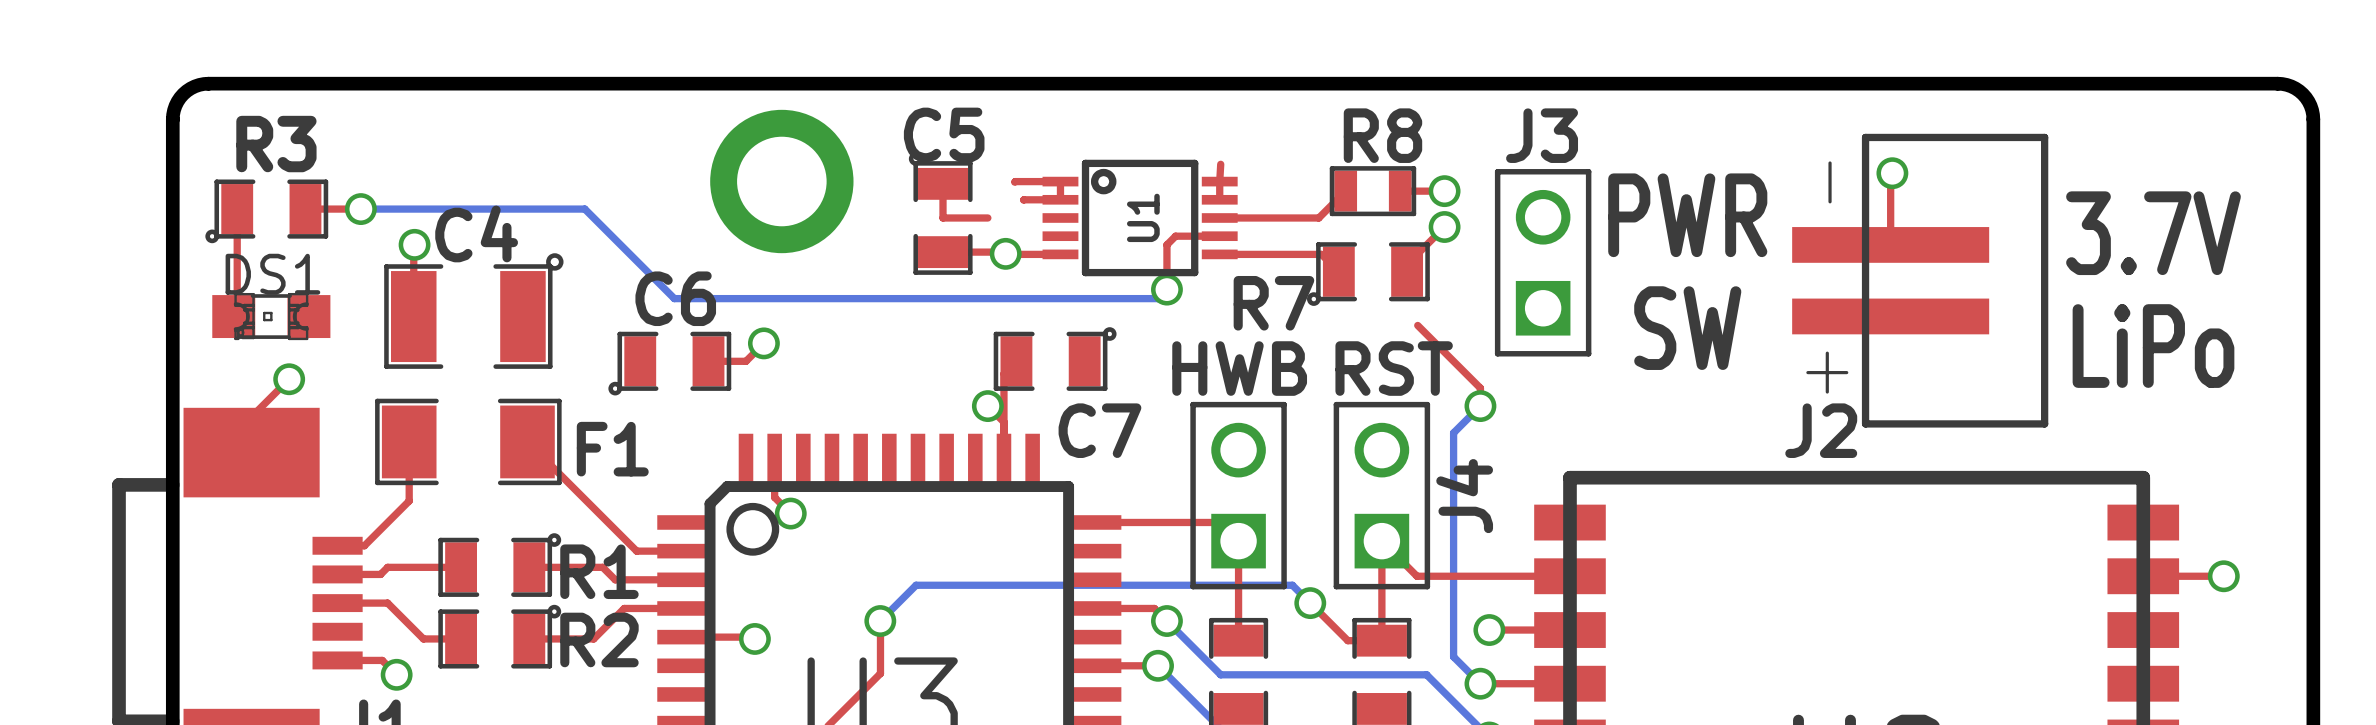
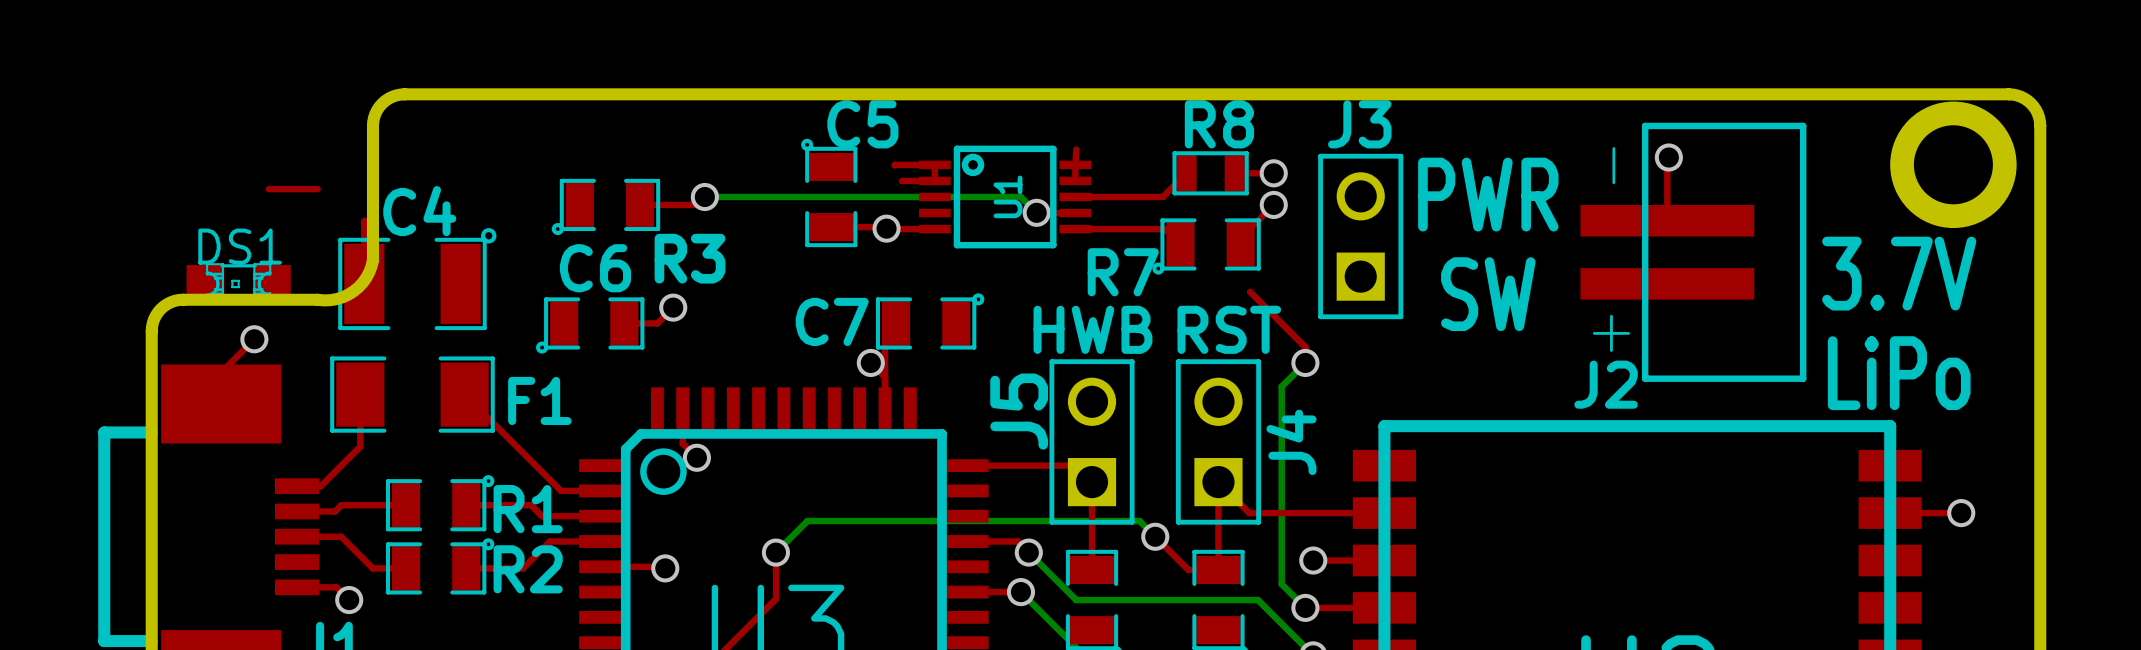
C5 name position: C5 (944, 134) -> C5 (862, 124)
board edge: (2313, 137) (2313, 114) (2308, 101) (2295, 88) (2277, 83) (203, 83) (190, 88) (183, 94) (175, 105) (173, 114) (172, 370) -> (2040, 125) (2037, 113) (2031, 103) (2020, 96) (2008, 94) (400, 94) (385, 100) (379, 106) (374, 117) (372, 260) (369, 272) (358, 287) (348, 294) (330, 300) (175, 300) (167, 303) (158, 312) (154, 319) (151, 331)
R3 name position: R3 (276, 144) -> R3 (690, 258)
part: (781, 181) -> none
part: none -> (1953, 164)
top track: (943, 183) (943, 217) (987, 217) -> none
top track: (237, 209) (237, 313) (233, 316) -> none
bottom track: (360, 209) (584, 209) (674, 298) (1157, 298) (1166, 289) -> none
via: (360, 209) -> none
R3 position: (266, 211) -> (605, 206)
top track: none -> (704, 197) (696, 204) (640, 204)
bottom track: none -> (704, 197) (1020, 197) (1036, 212)
via: none -> (704, 197)
text position: 3.7V (2153, 233) -> 3.7V (1899, 273)
top track: (1175, 236) (1166, 244) (1166, 289) -> none
via: (414, 244) -> none
via position: (1166, 289) -> (1036, 212)
text position: LiPo (2153, 346) -> LiPo (1899, 373)
C7 name position: C7 (1099, 430) -> C7 (832, 321)
J5 name: none -> J5 (1019, 411)

